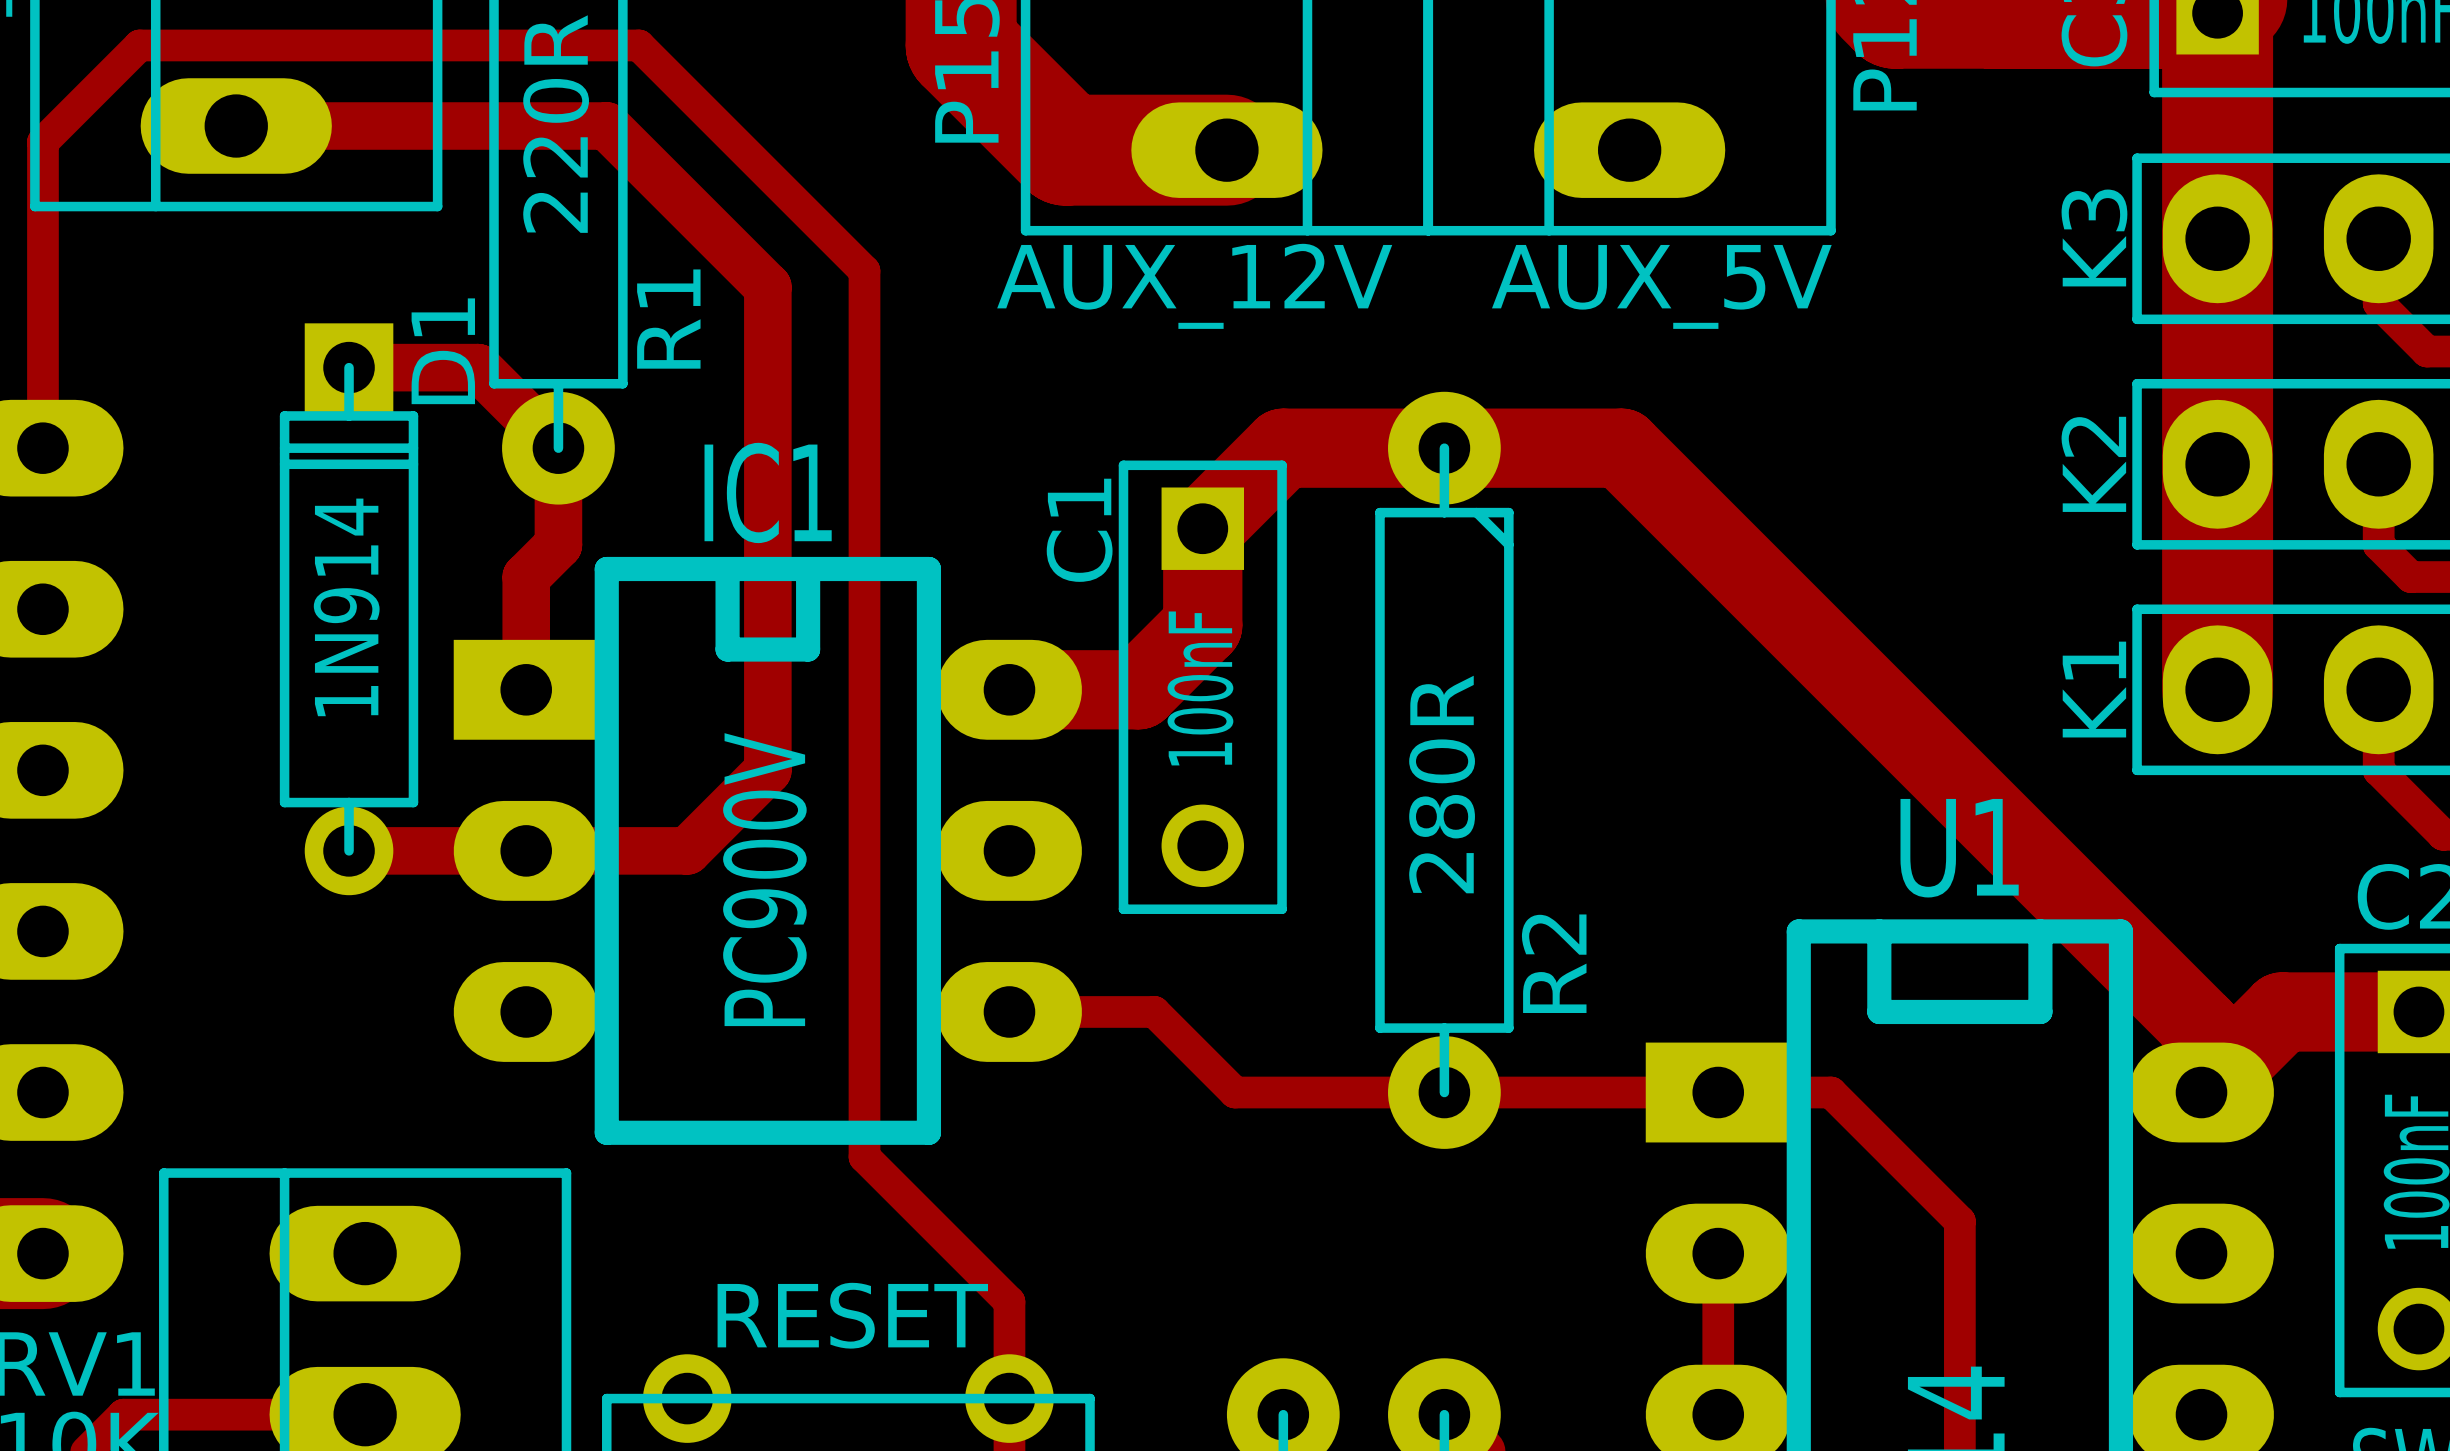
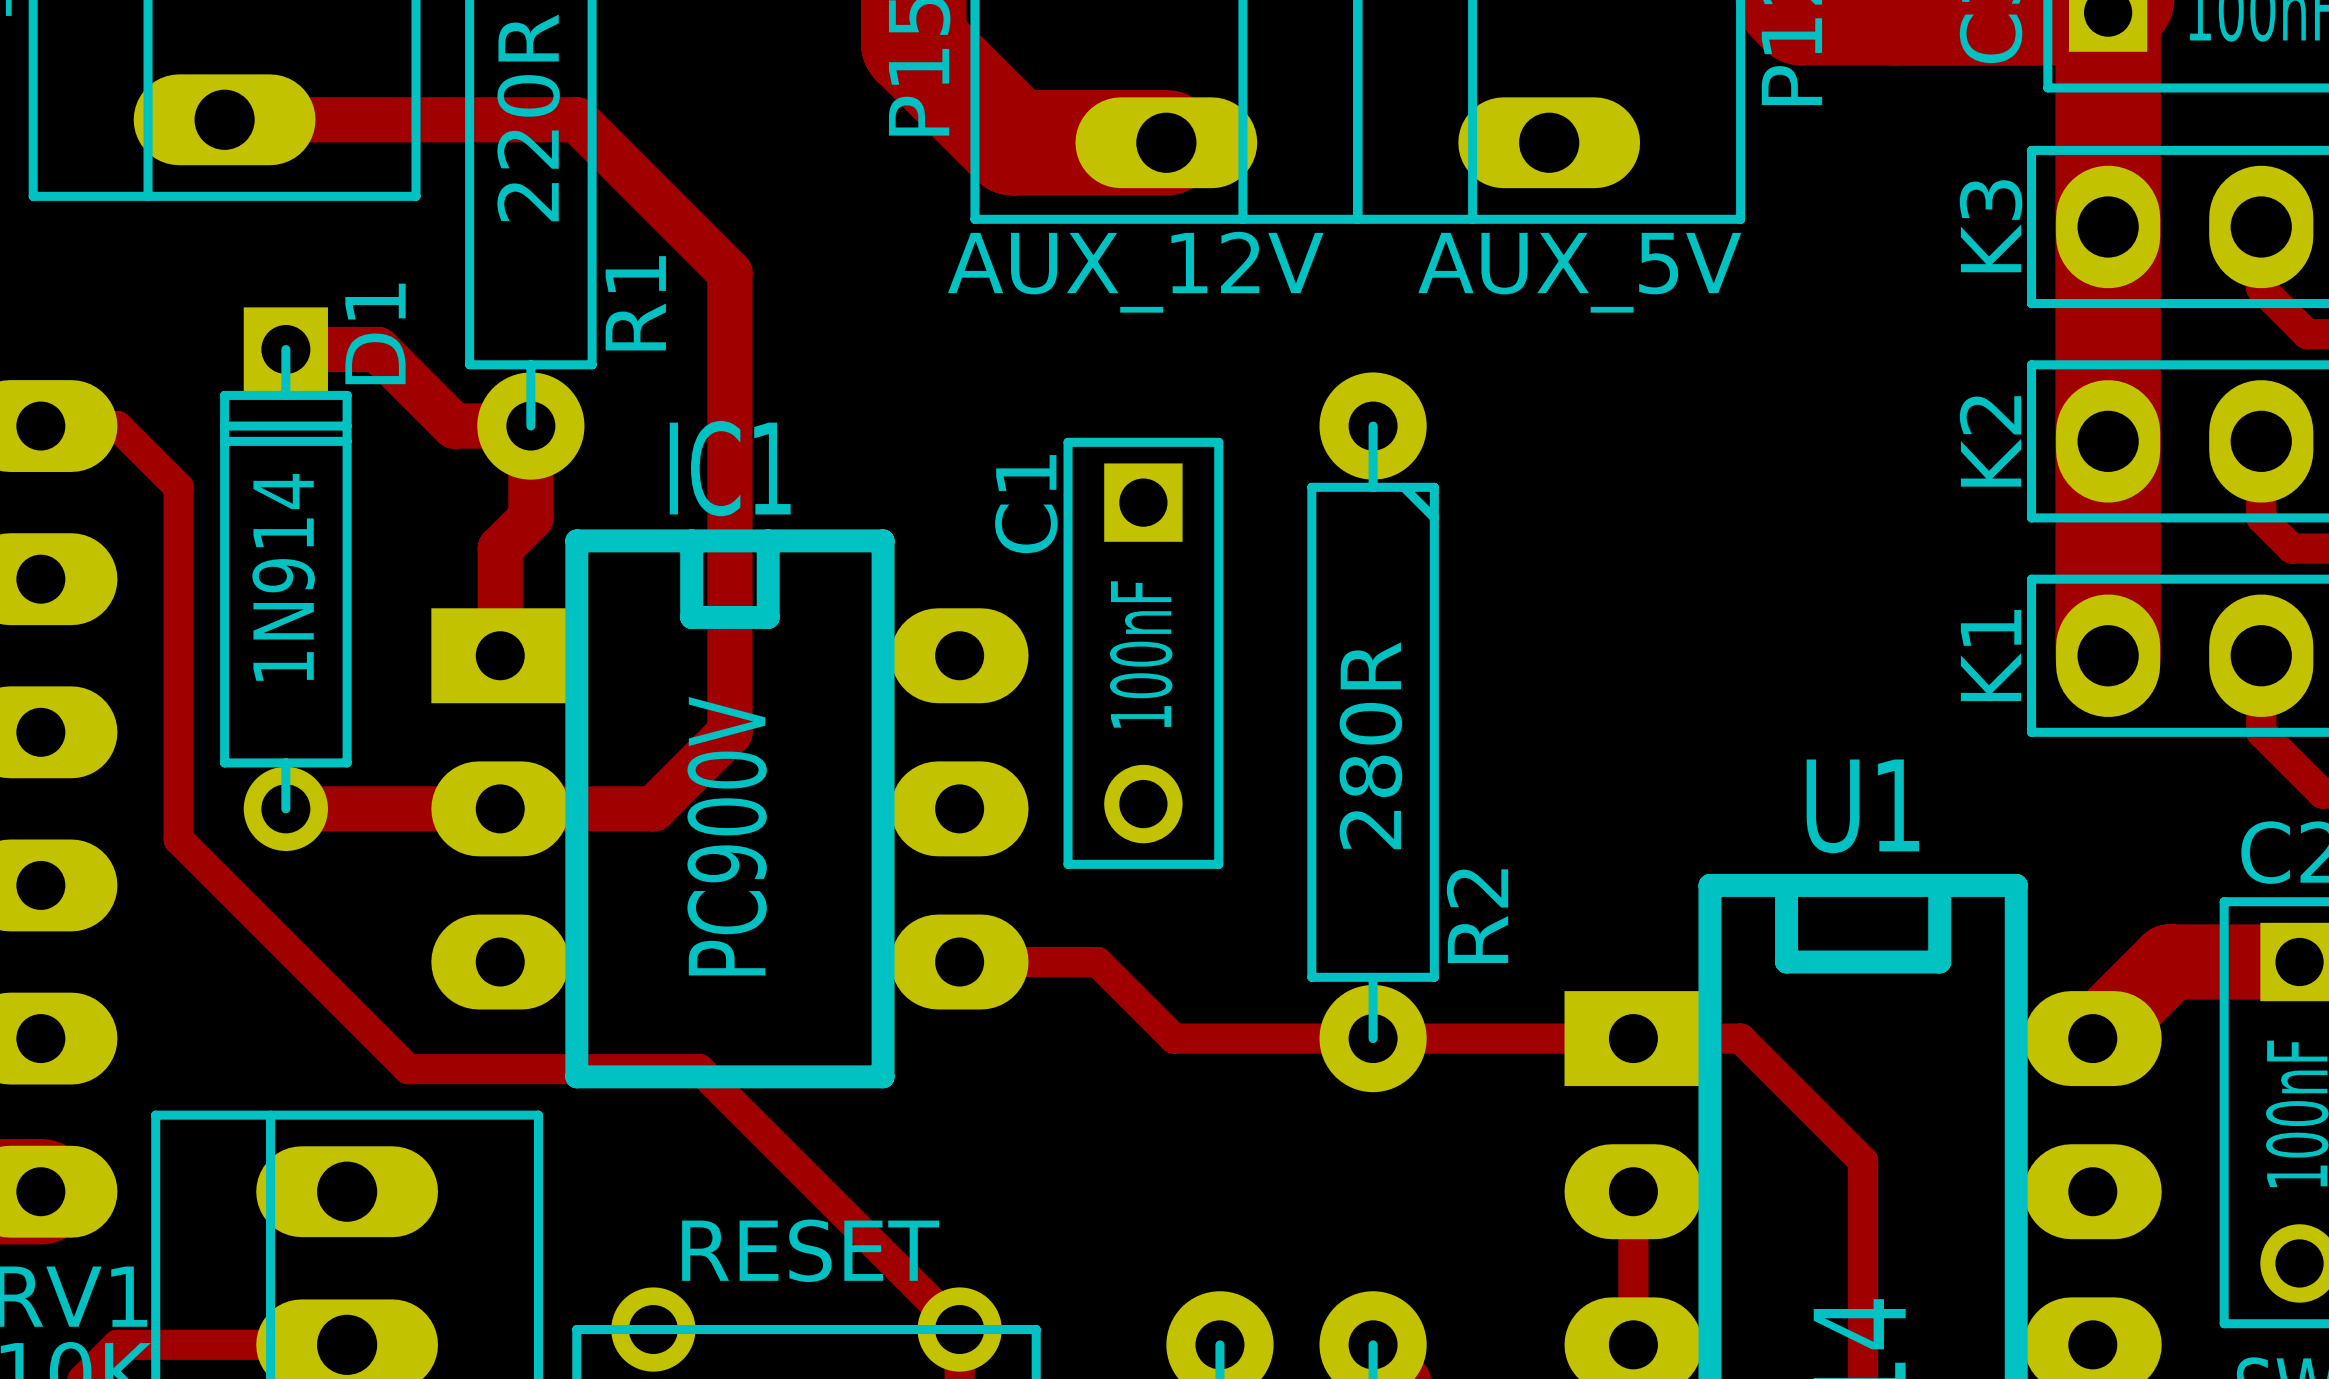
track: (397, 367) (477, 367) (558, 448) -> (377, 349) (454, 426) (530, 426)
track: (42, 448) (42, 142) (139, 45) (638, 45) (864, 270) (864, 1156) (1009, 1301) (1009, 1398) -> (40, 426) (117, 426) (178, 487) (178, 839) (408, 1069) (699, 1069) (959, 1329)
D1 position: (349, 609) -> (285, 579)
track: (1009, 689) (1138, 689) (1202, 625) (1202, 528) (1283, 448) (1621, 448) (2201, 1028) (2201, 1092) -> none

